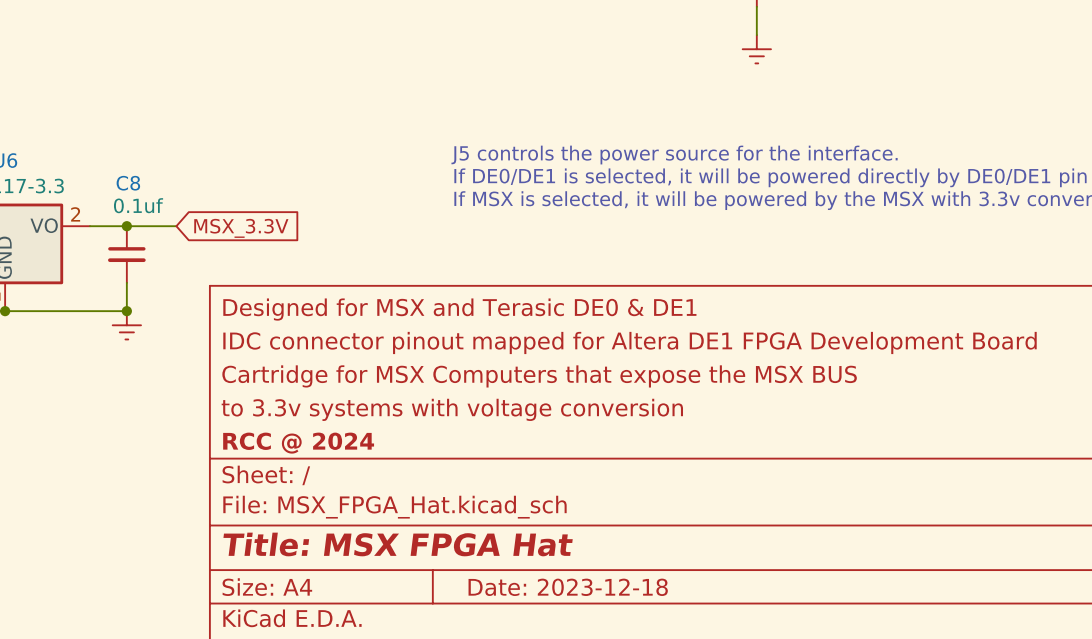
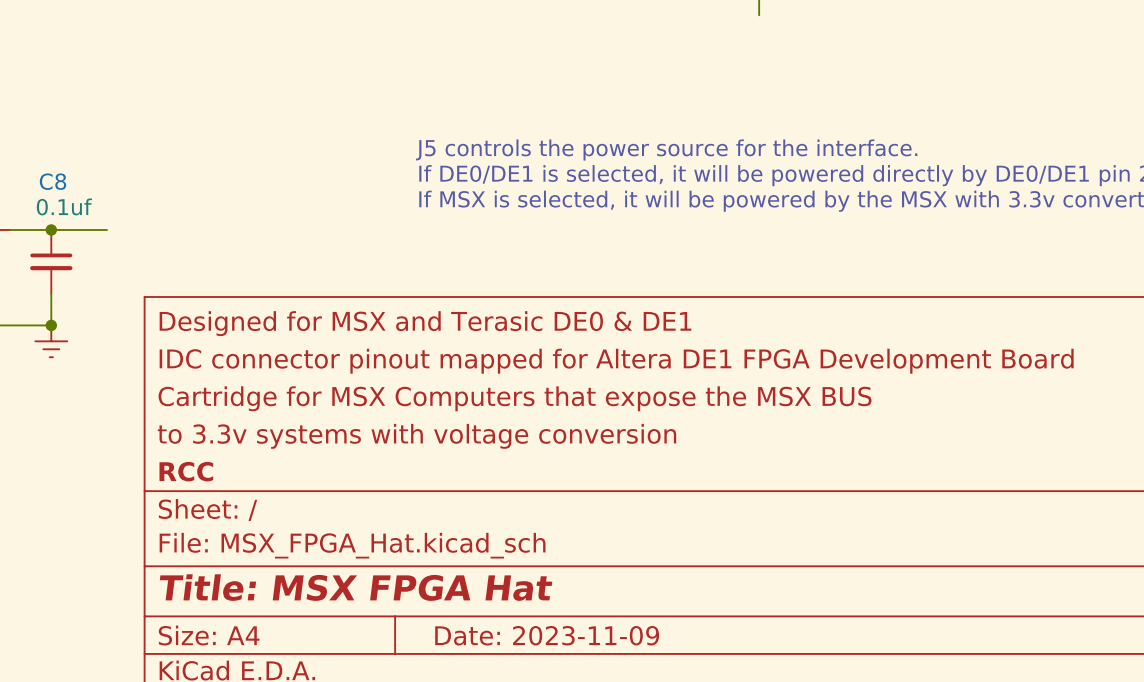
power symbol: (756, 49) -> none
global label: MSX_3.3V (241, 228) -> none
title block: RCC @ 2024 (298, 443) -> RCC (186, 471)
title block: Date: 2023-12-18 (568, 587) -> Date: 2023-11-09 (547, 635)

